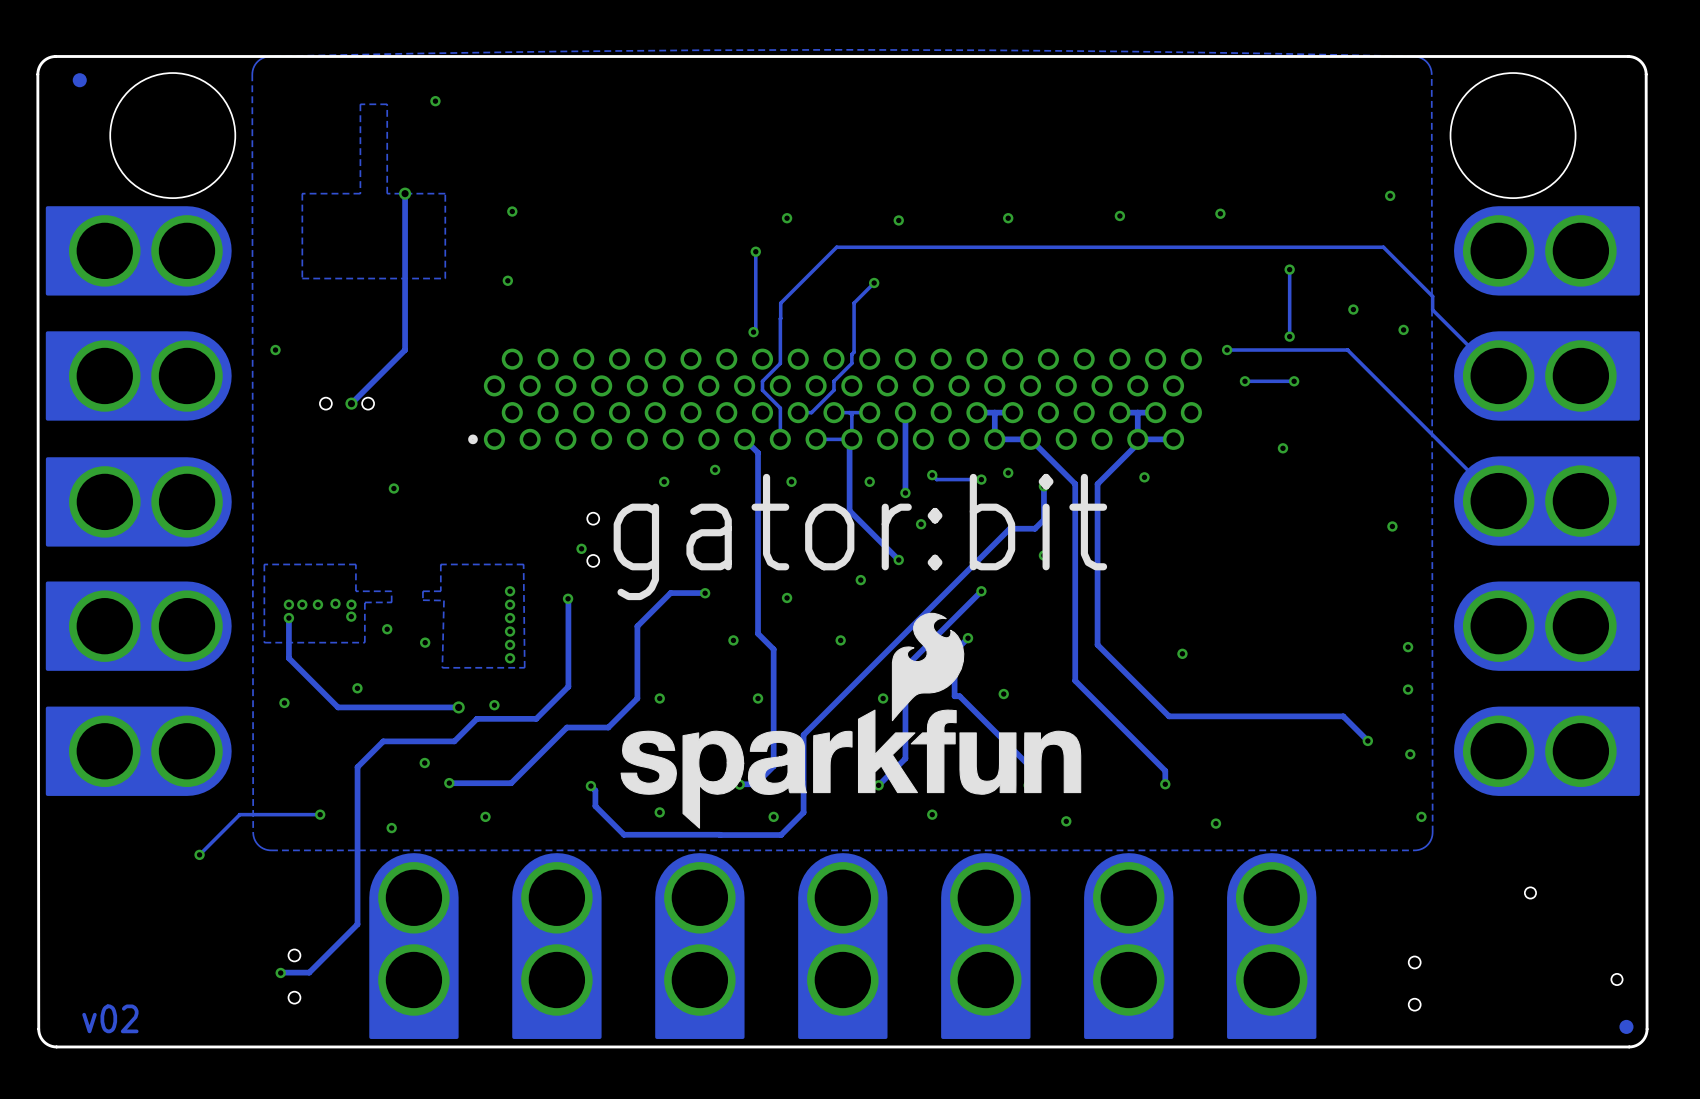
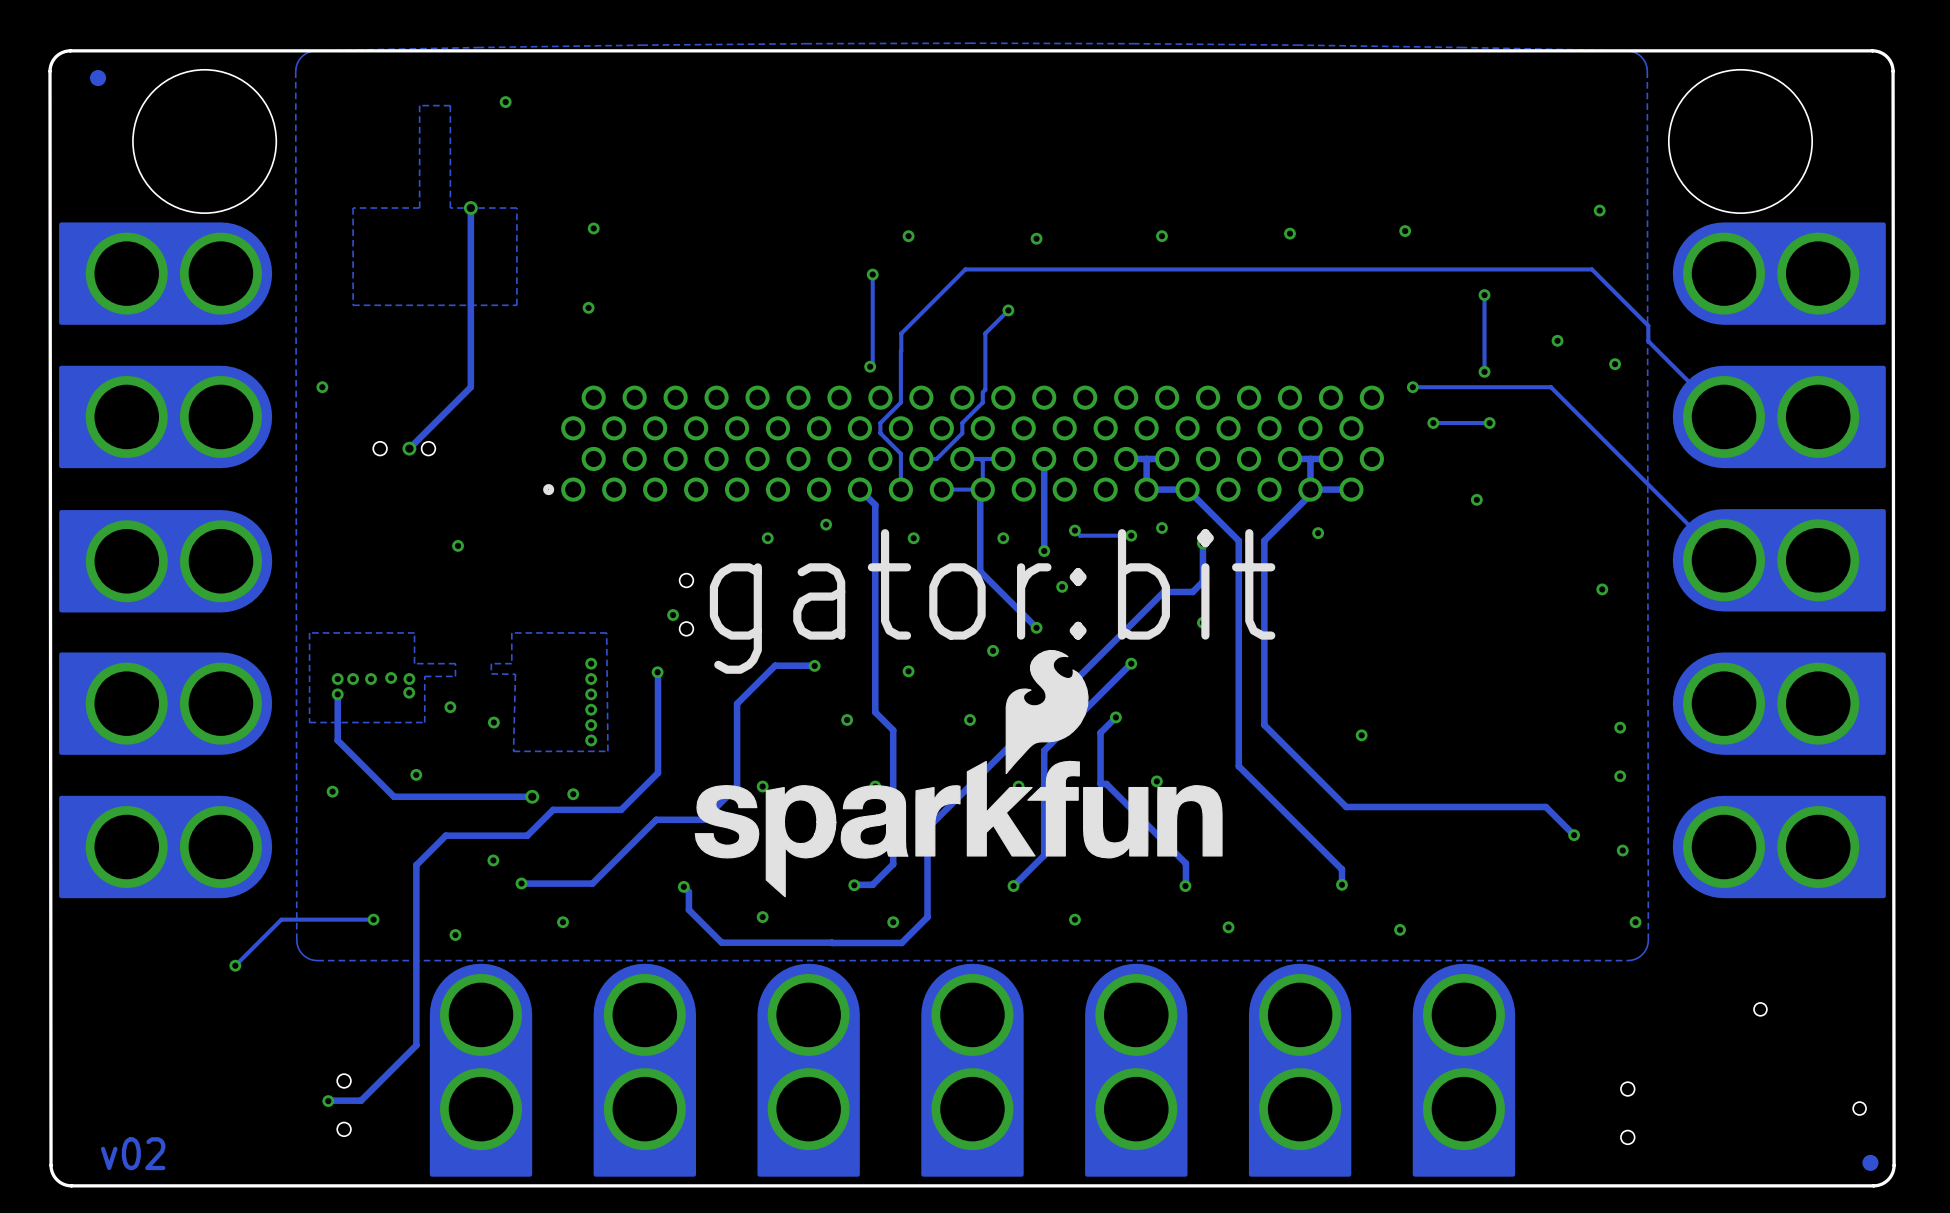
drawing position: (850, 720) -> (958, 773)

